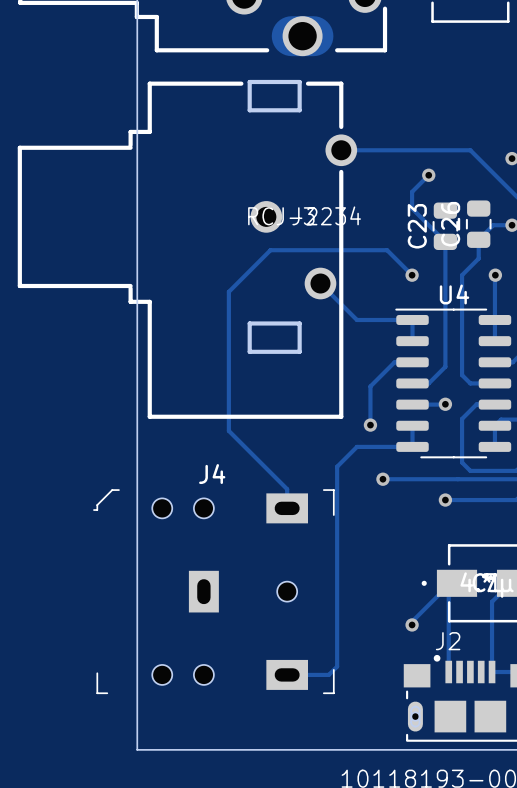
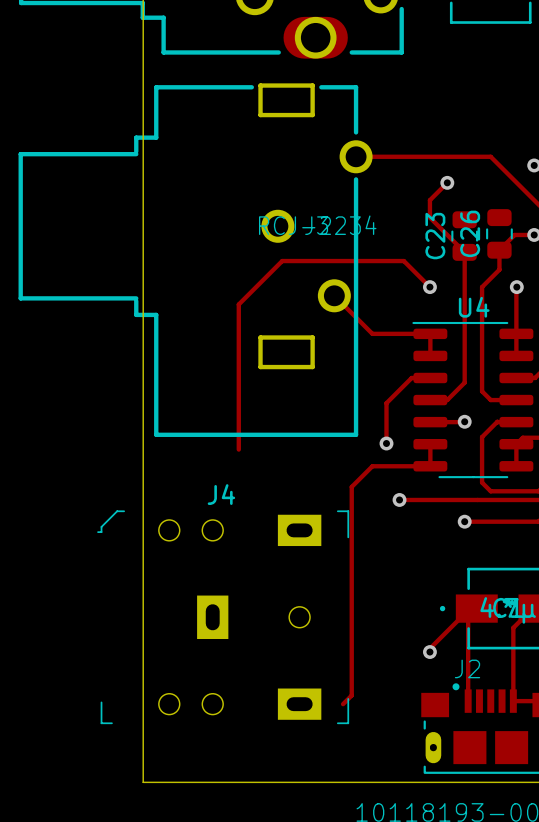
track: (228, 430) (287, 489) (287, 508) -> none
track: (287, 674) (328, 674) -> none

